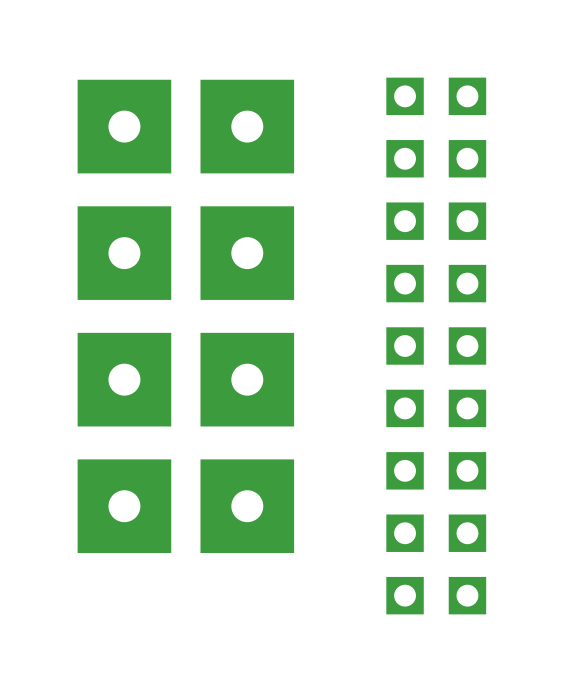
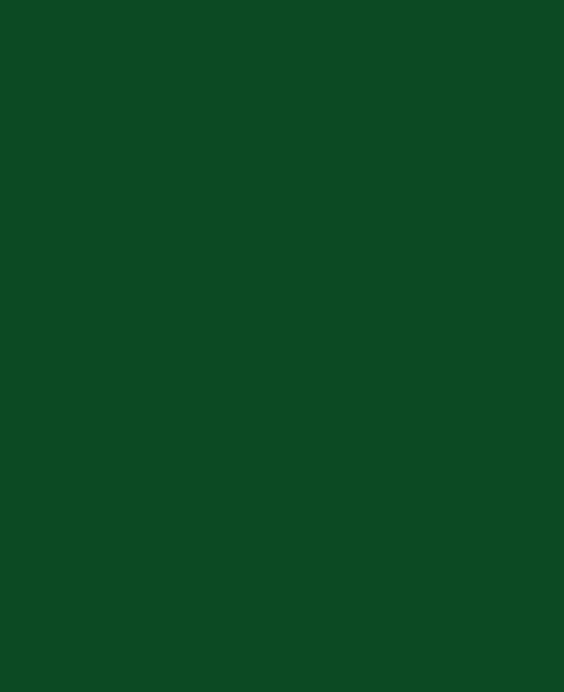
part: (185, 126) -> none
part: (185, 253) -> none
part: (436, 346) -> none
part: (185, 379) -> none
part: (185, 506) -> none

